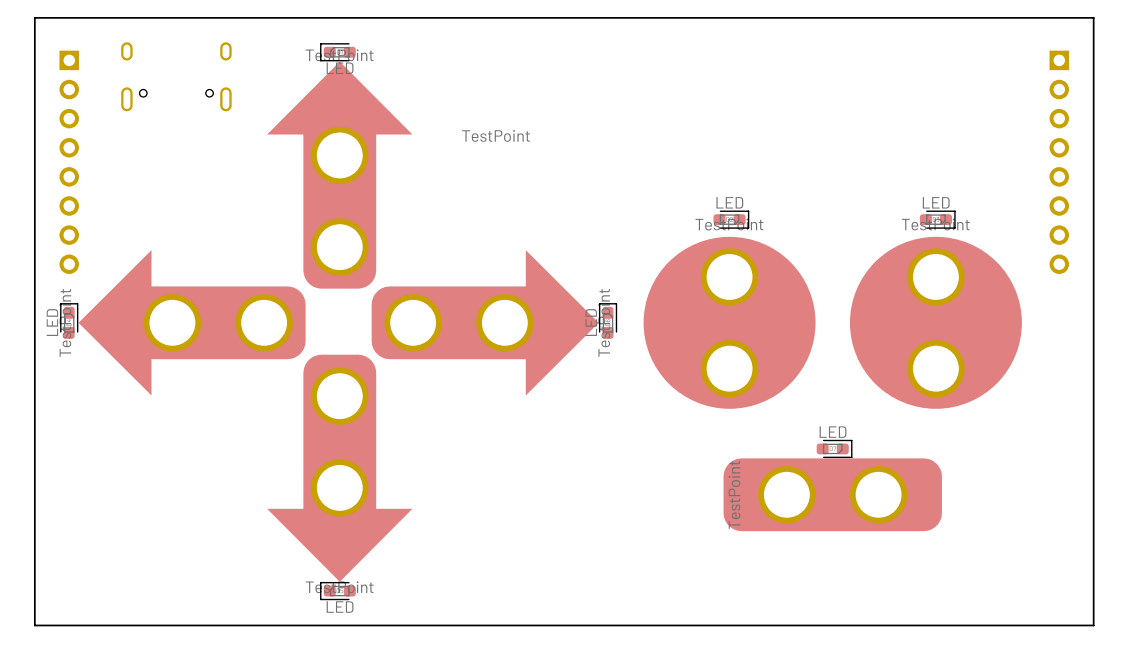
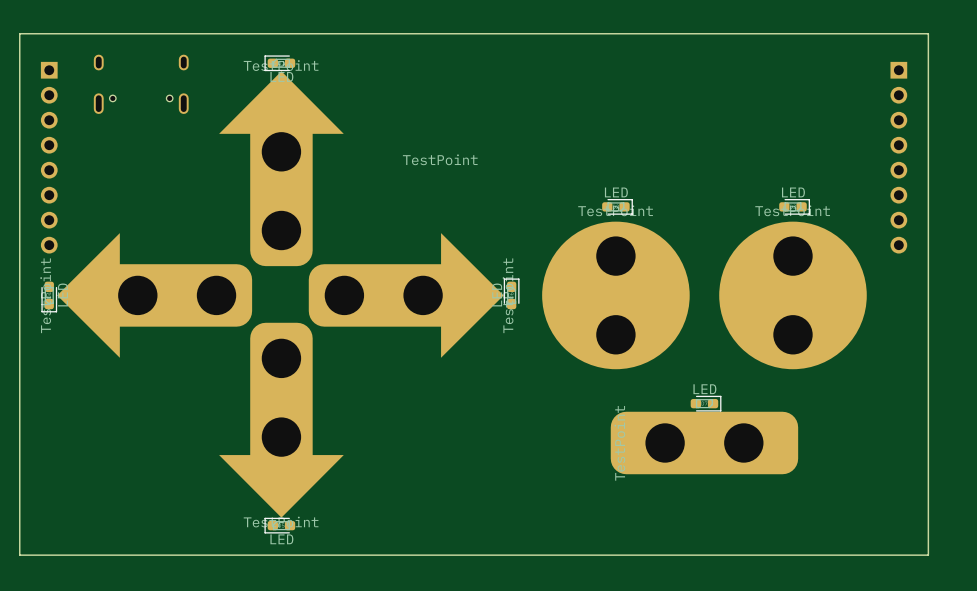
part position: (496, 135) -> (440, 159)
part rotation: 0° (69, 320) -> 180° (49, 297)

